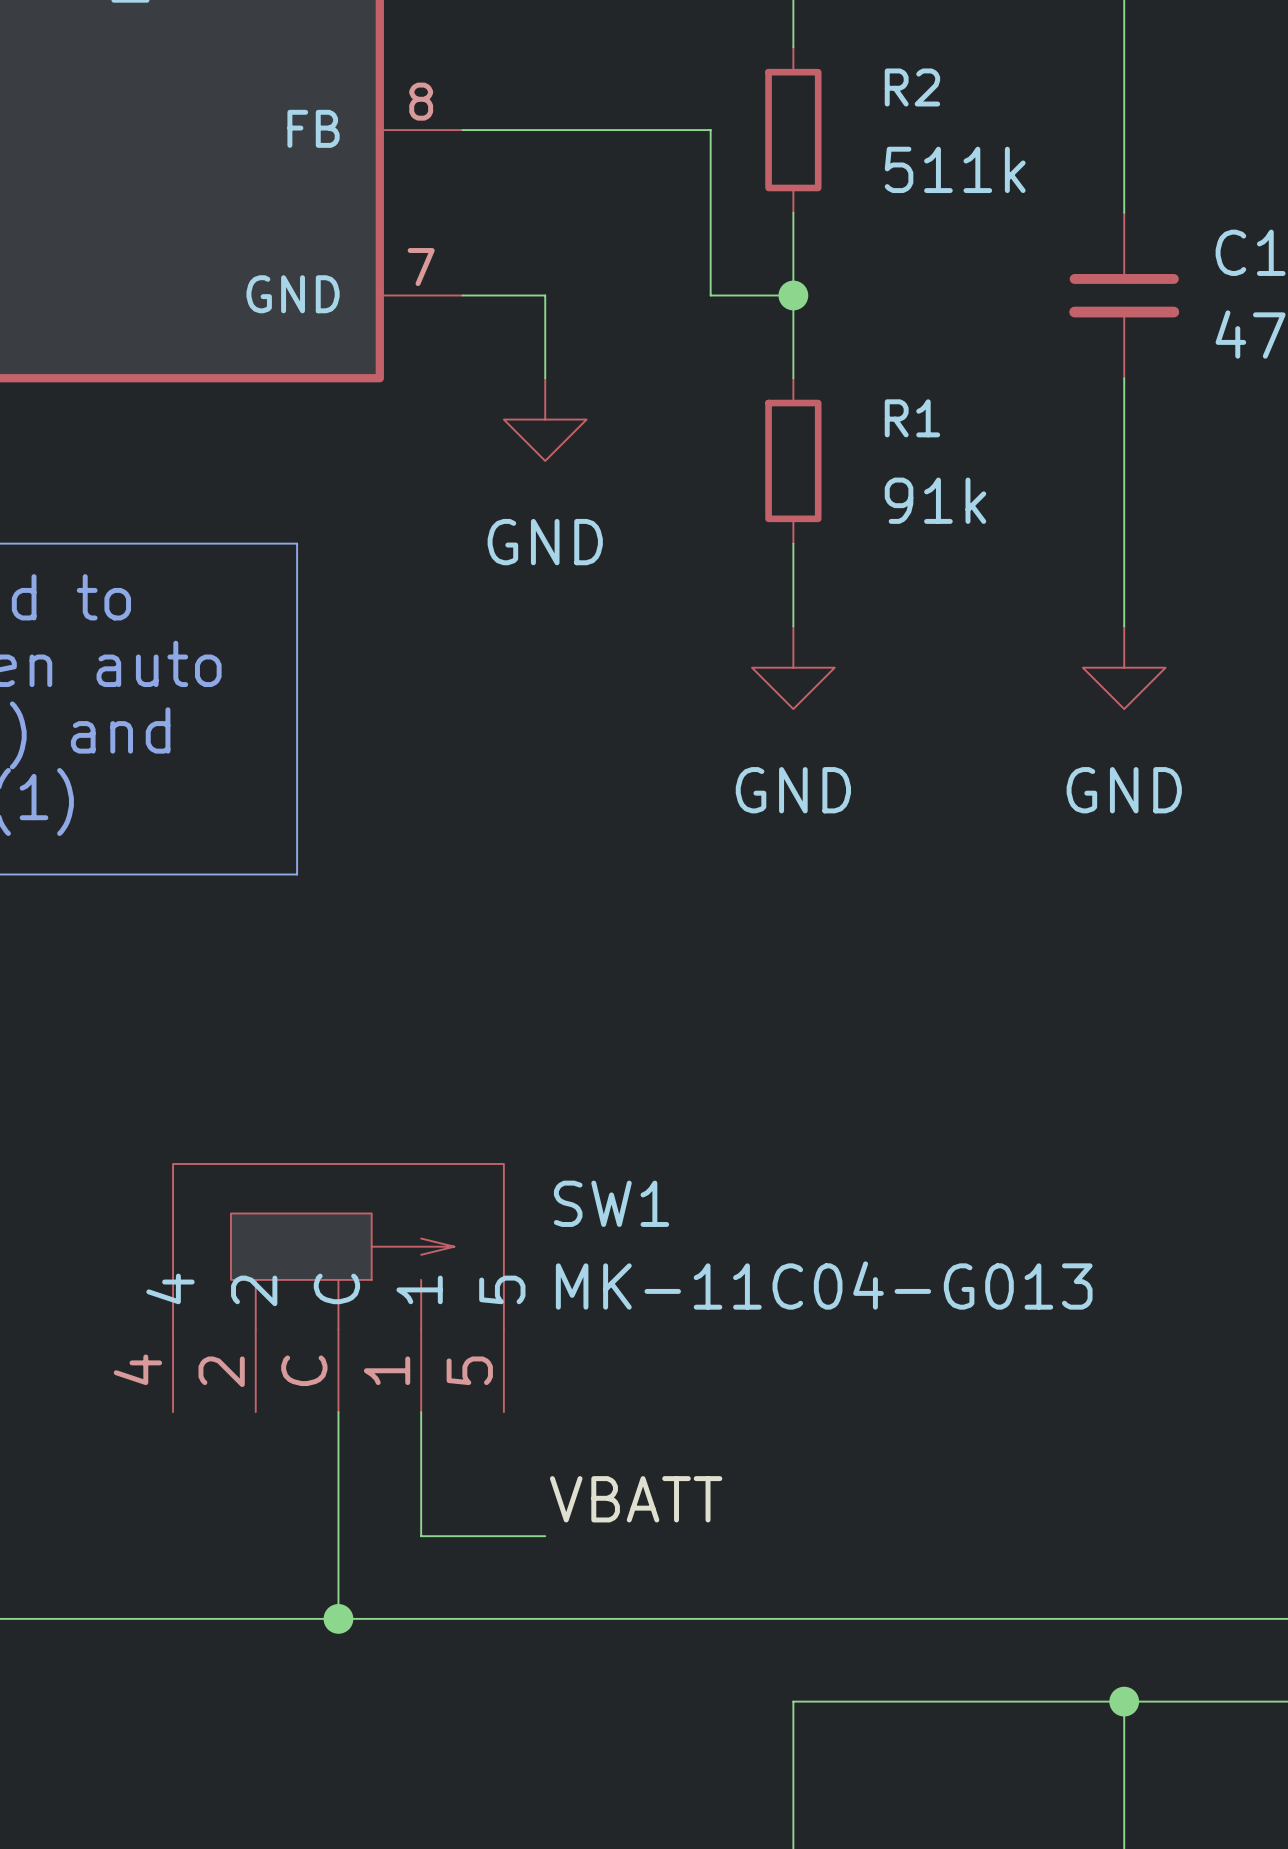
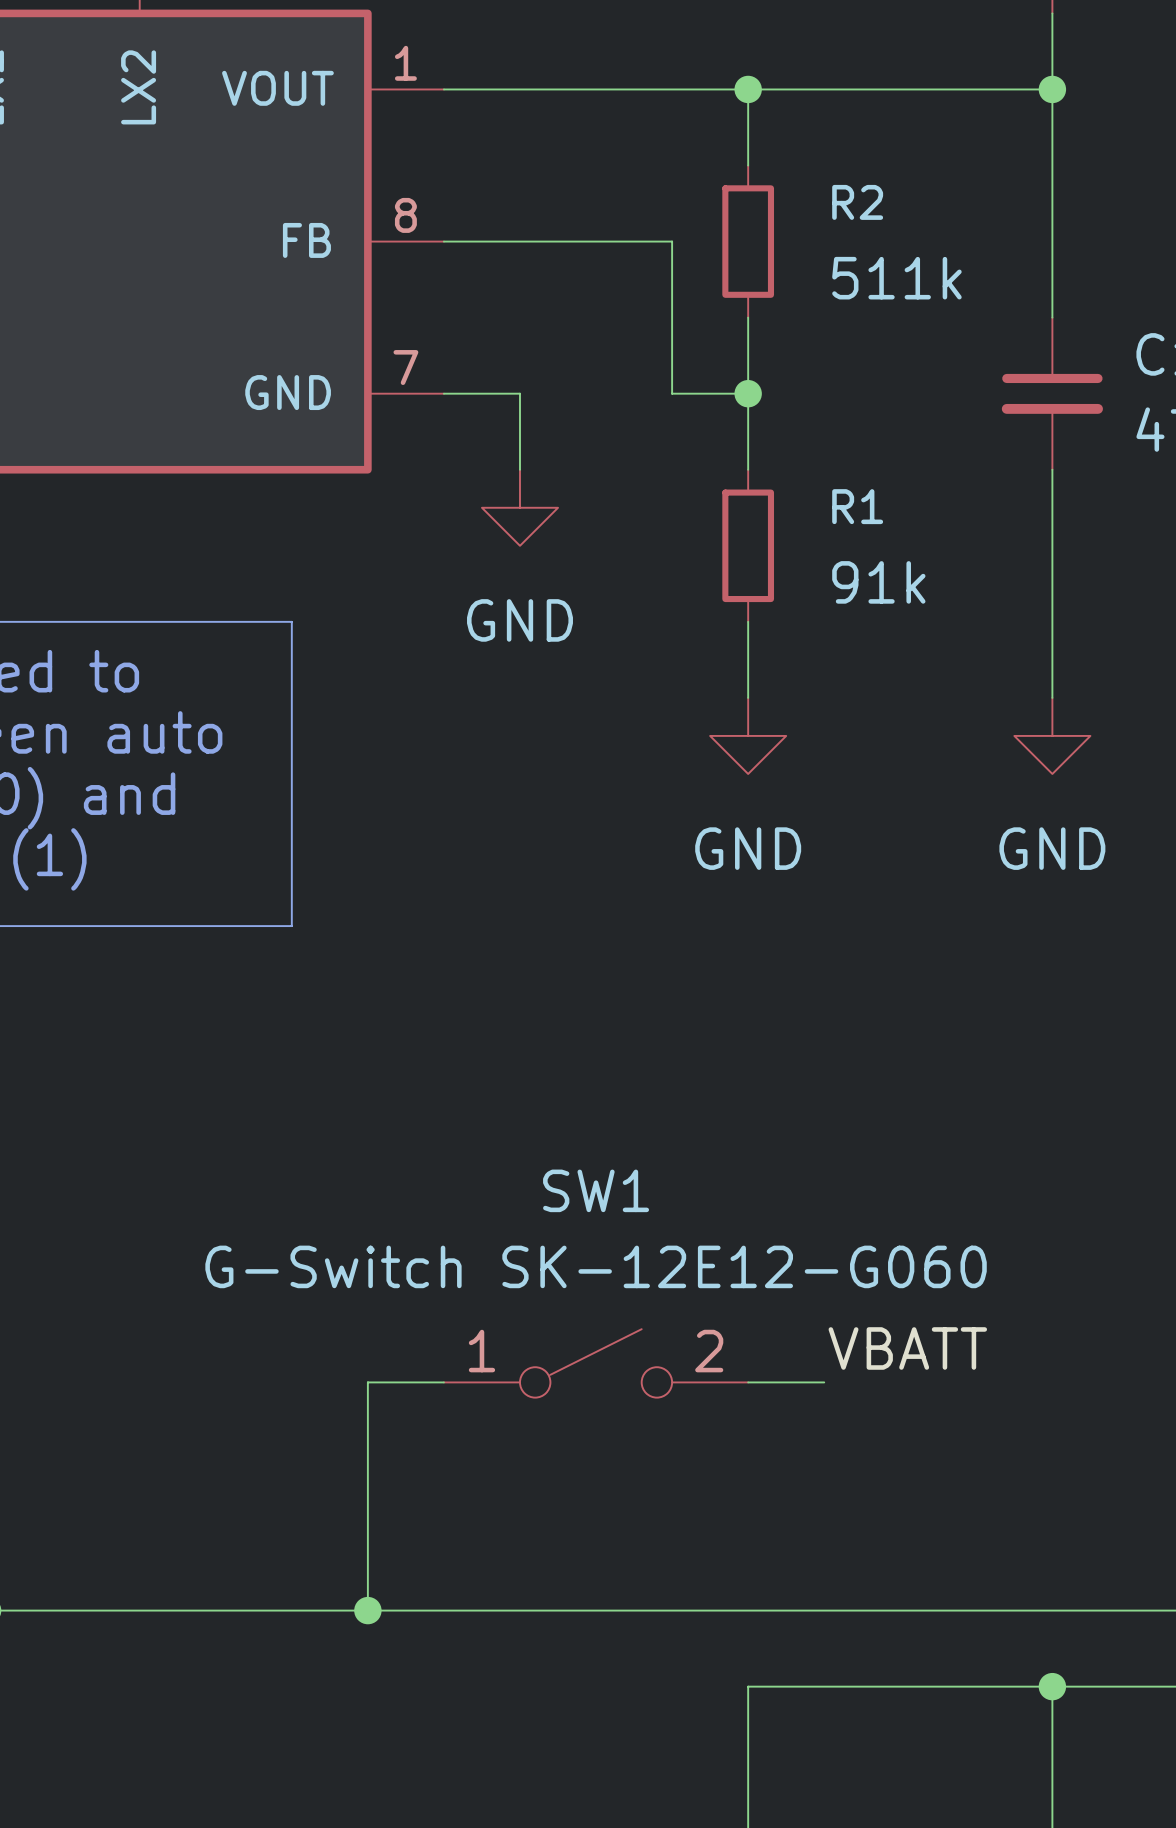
SW1 symbol: [173, 1163, 504, 1413] -> [443, 1329, 749, 1398]
SW1 name position: SW1 (611, 1203) -> SW1 (596, 1190)
SW1 value: MK-11C04-G013 (824, 1285) -> G-Switch SK-12E12-G060 (596, 1266)
wire: none -> (443, 1382) (367, 1382) (367, 1610)
wire: none -> (748, 1382) (824, 1382)
wire: (338, 1412) (338, 1618) -> none
wire: (421, 1412) (421, 1536) (545, 1536) -> none
label position: VBATT (636, 1499) -> VBATT (907, 1348)
junction position: (338, 1618) -> (367, 1610)

